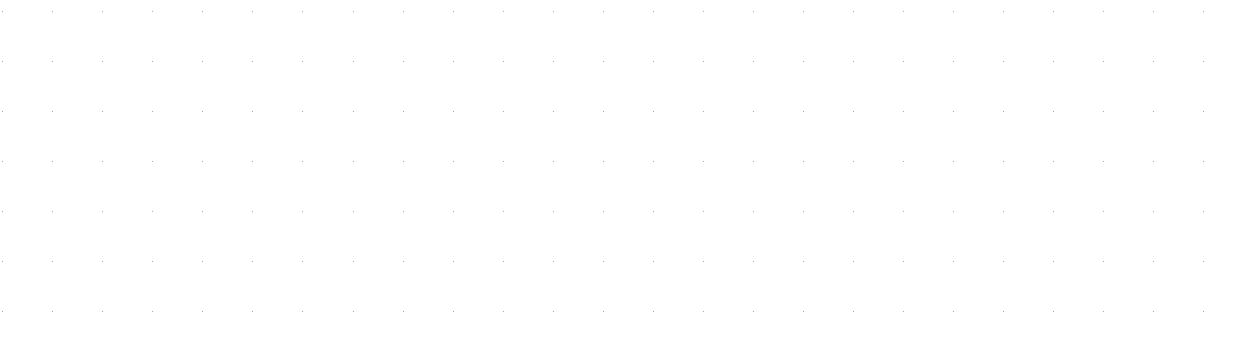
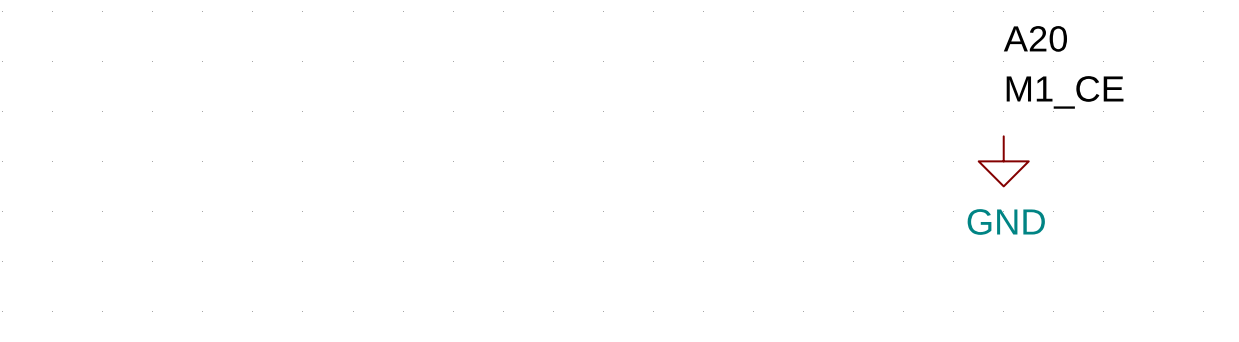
label: none -> A20 (1035, 38)
label: none -> M1_CE (1065, 92)
power symbol: none -> GND (1003, 161)

